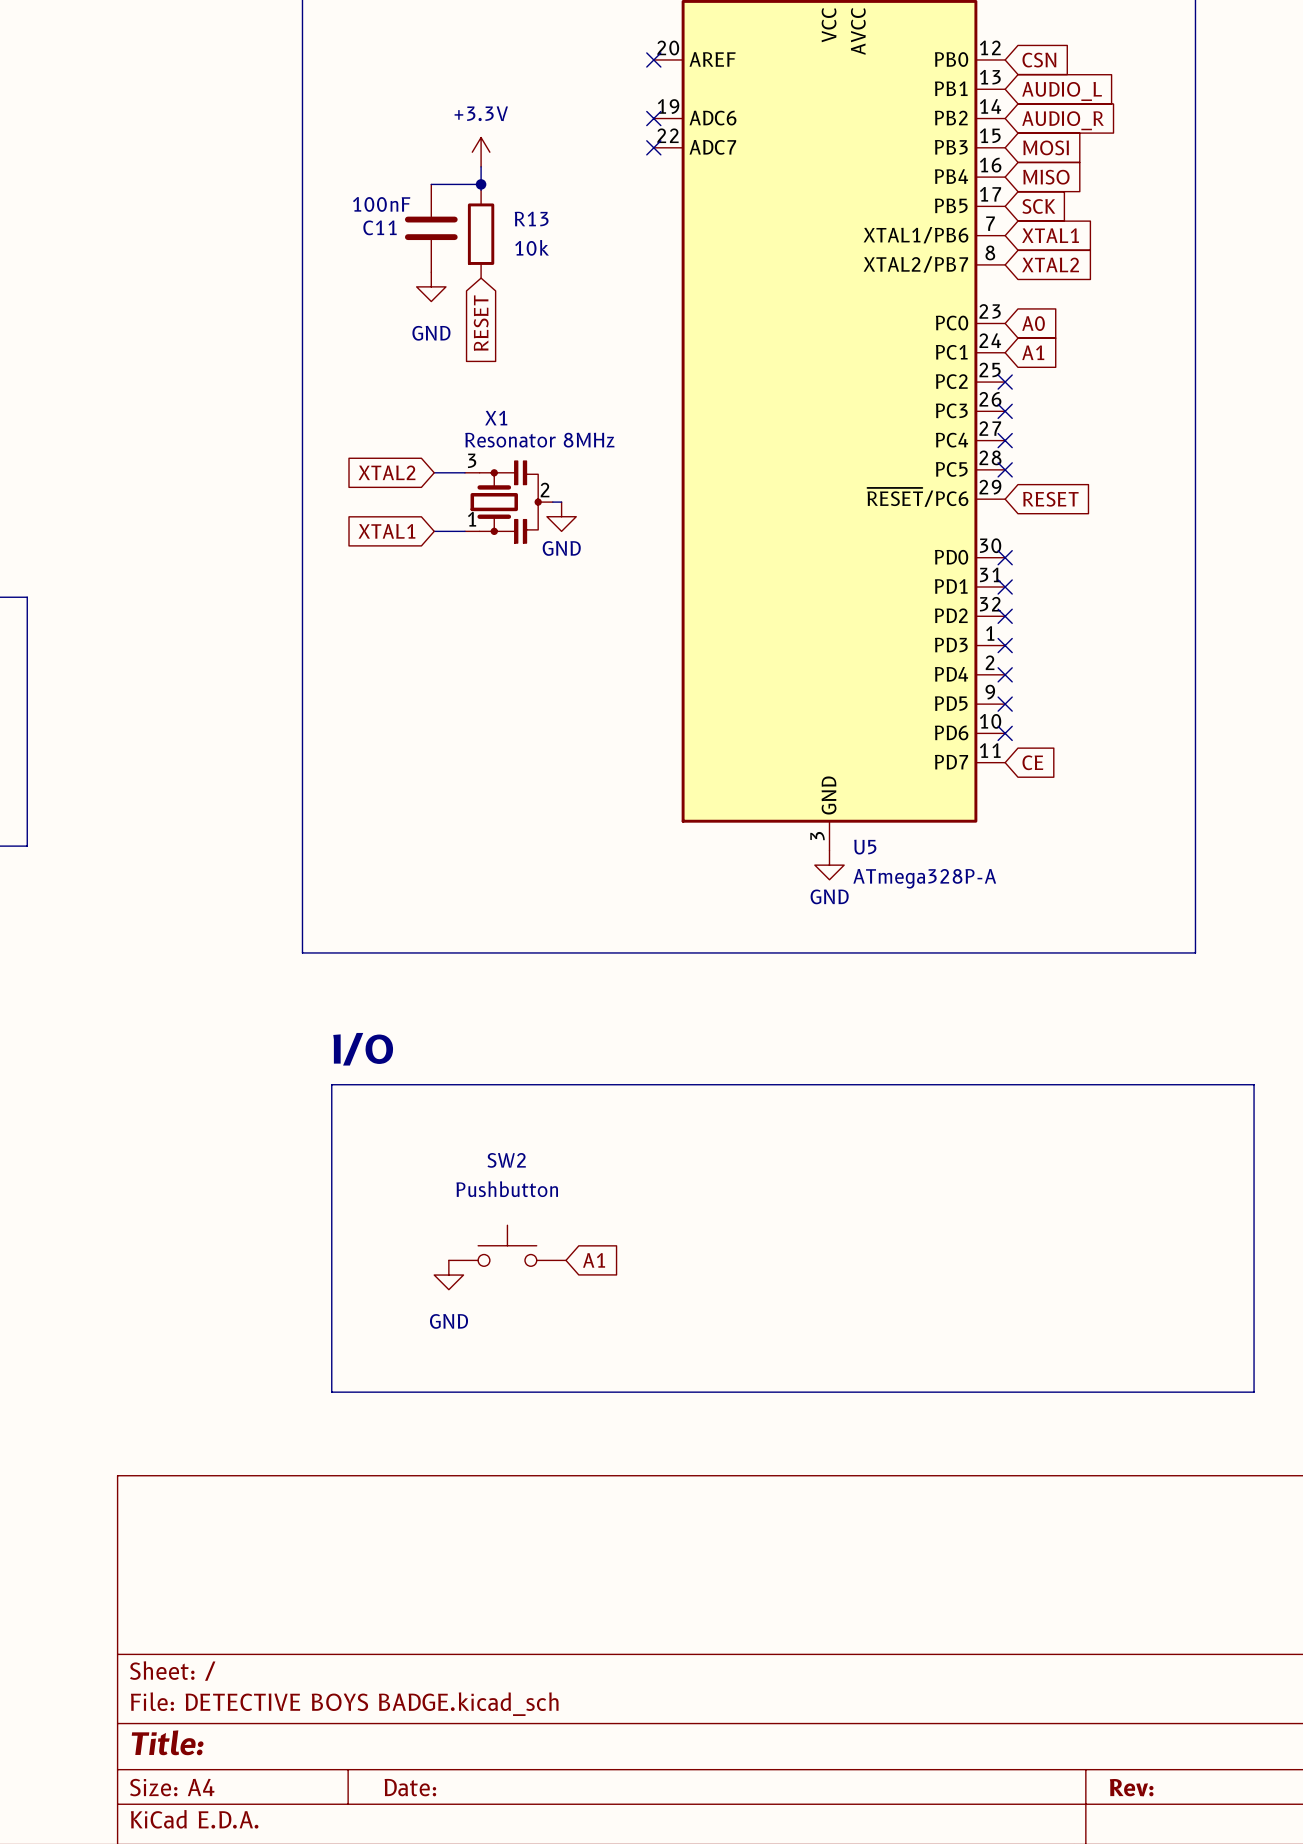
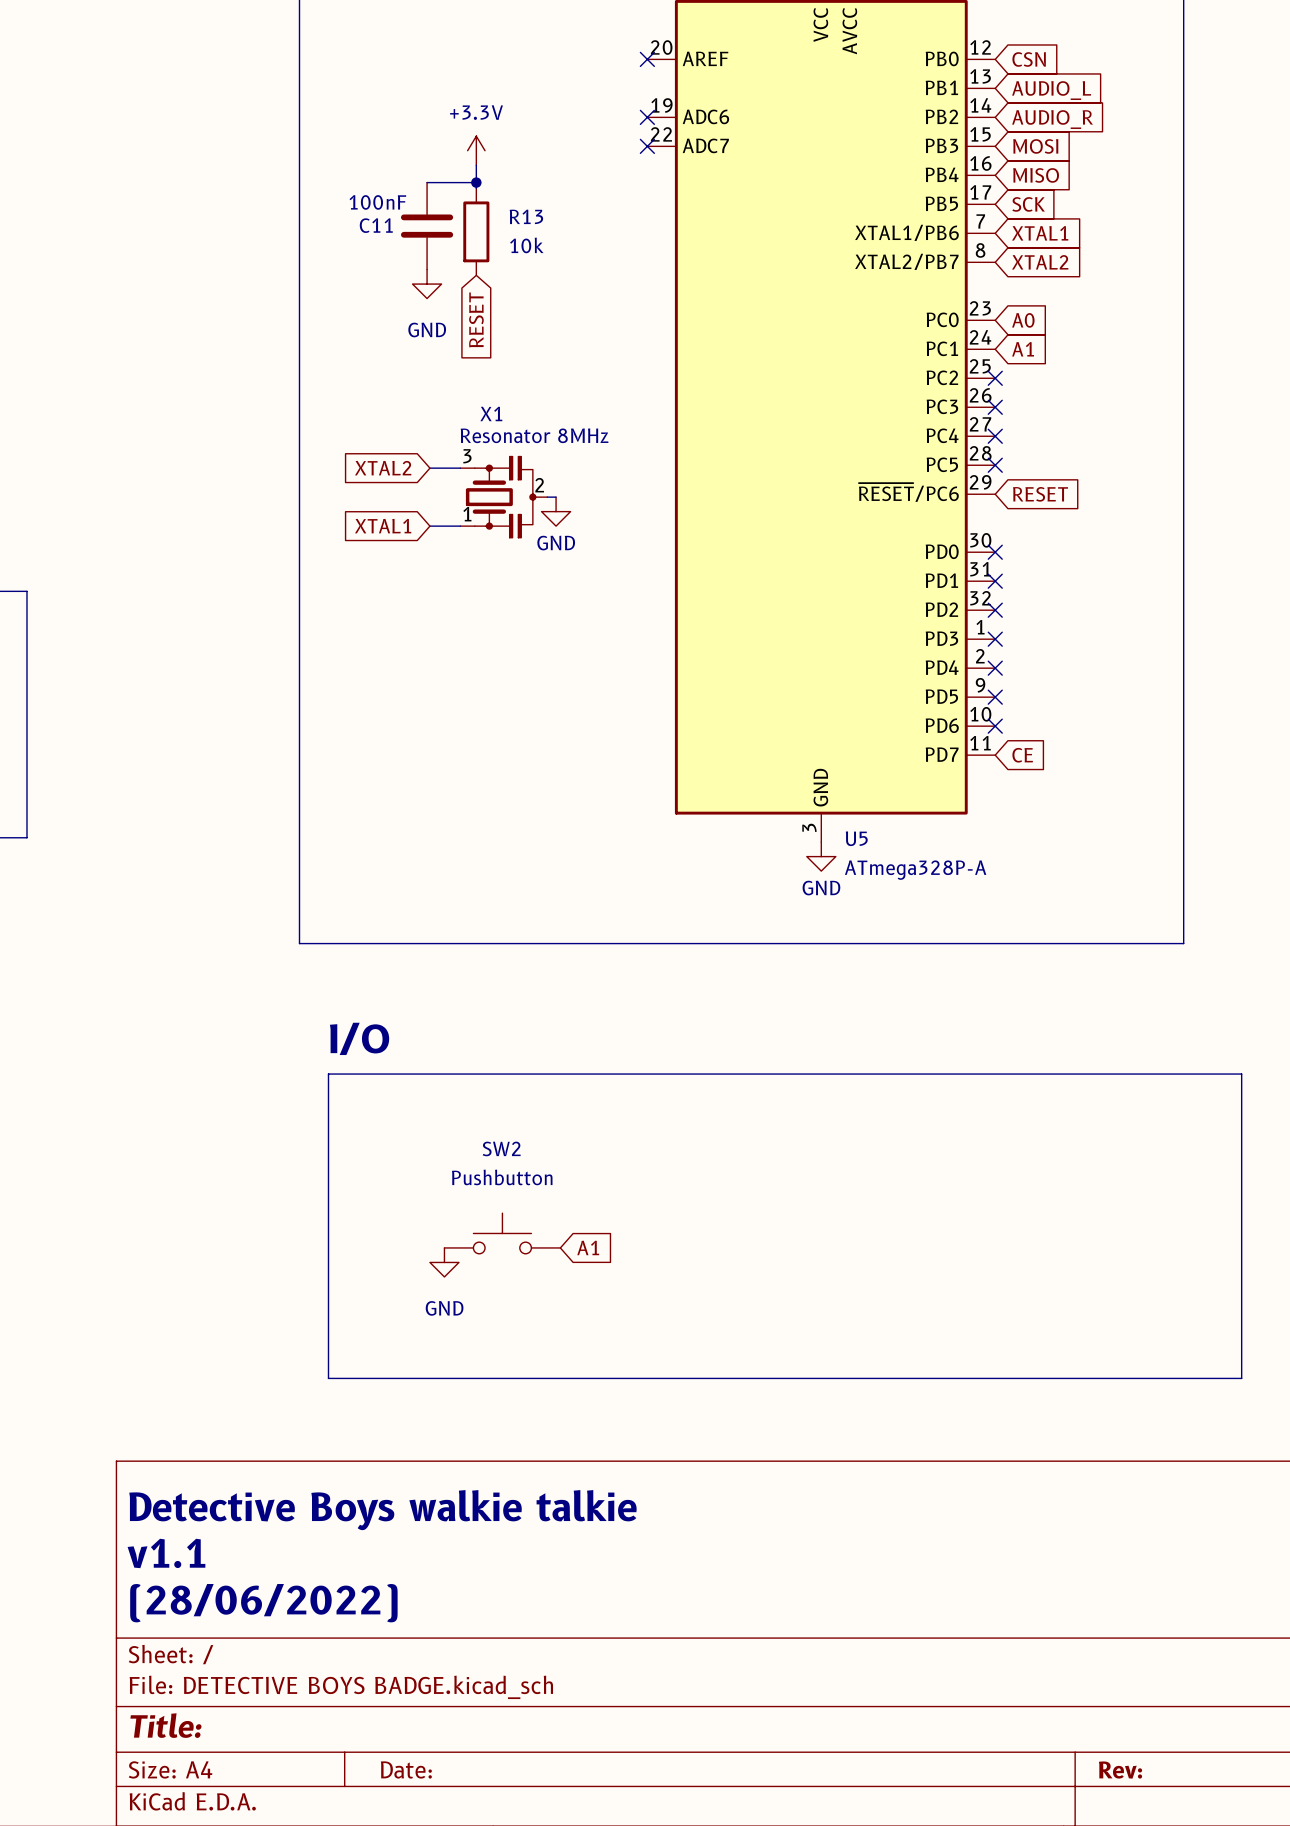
text: none -> Detective Boys walkie talkie (382, 1510)
text: none -> v1.1 (166, 1553)
text: none -> (28/06/2022) (263, 1603)

